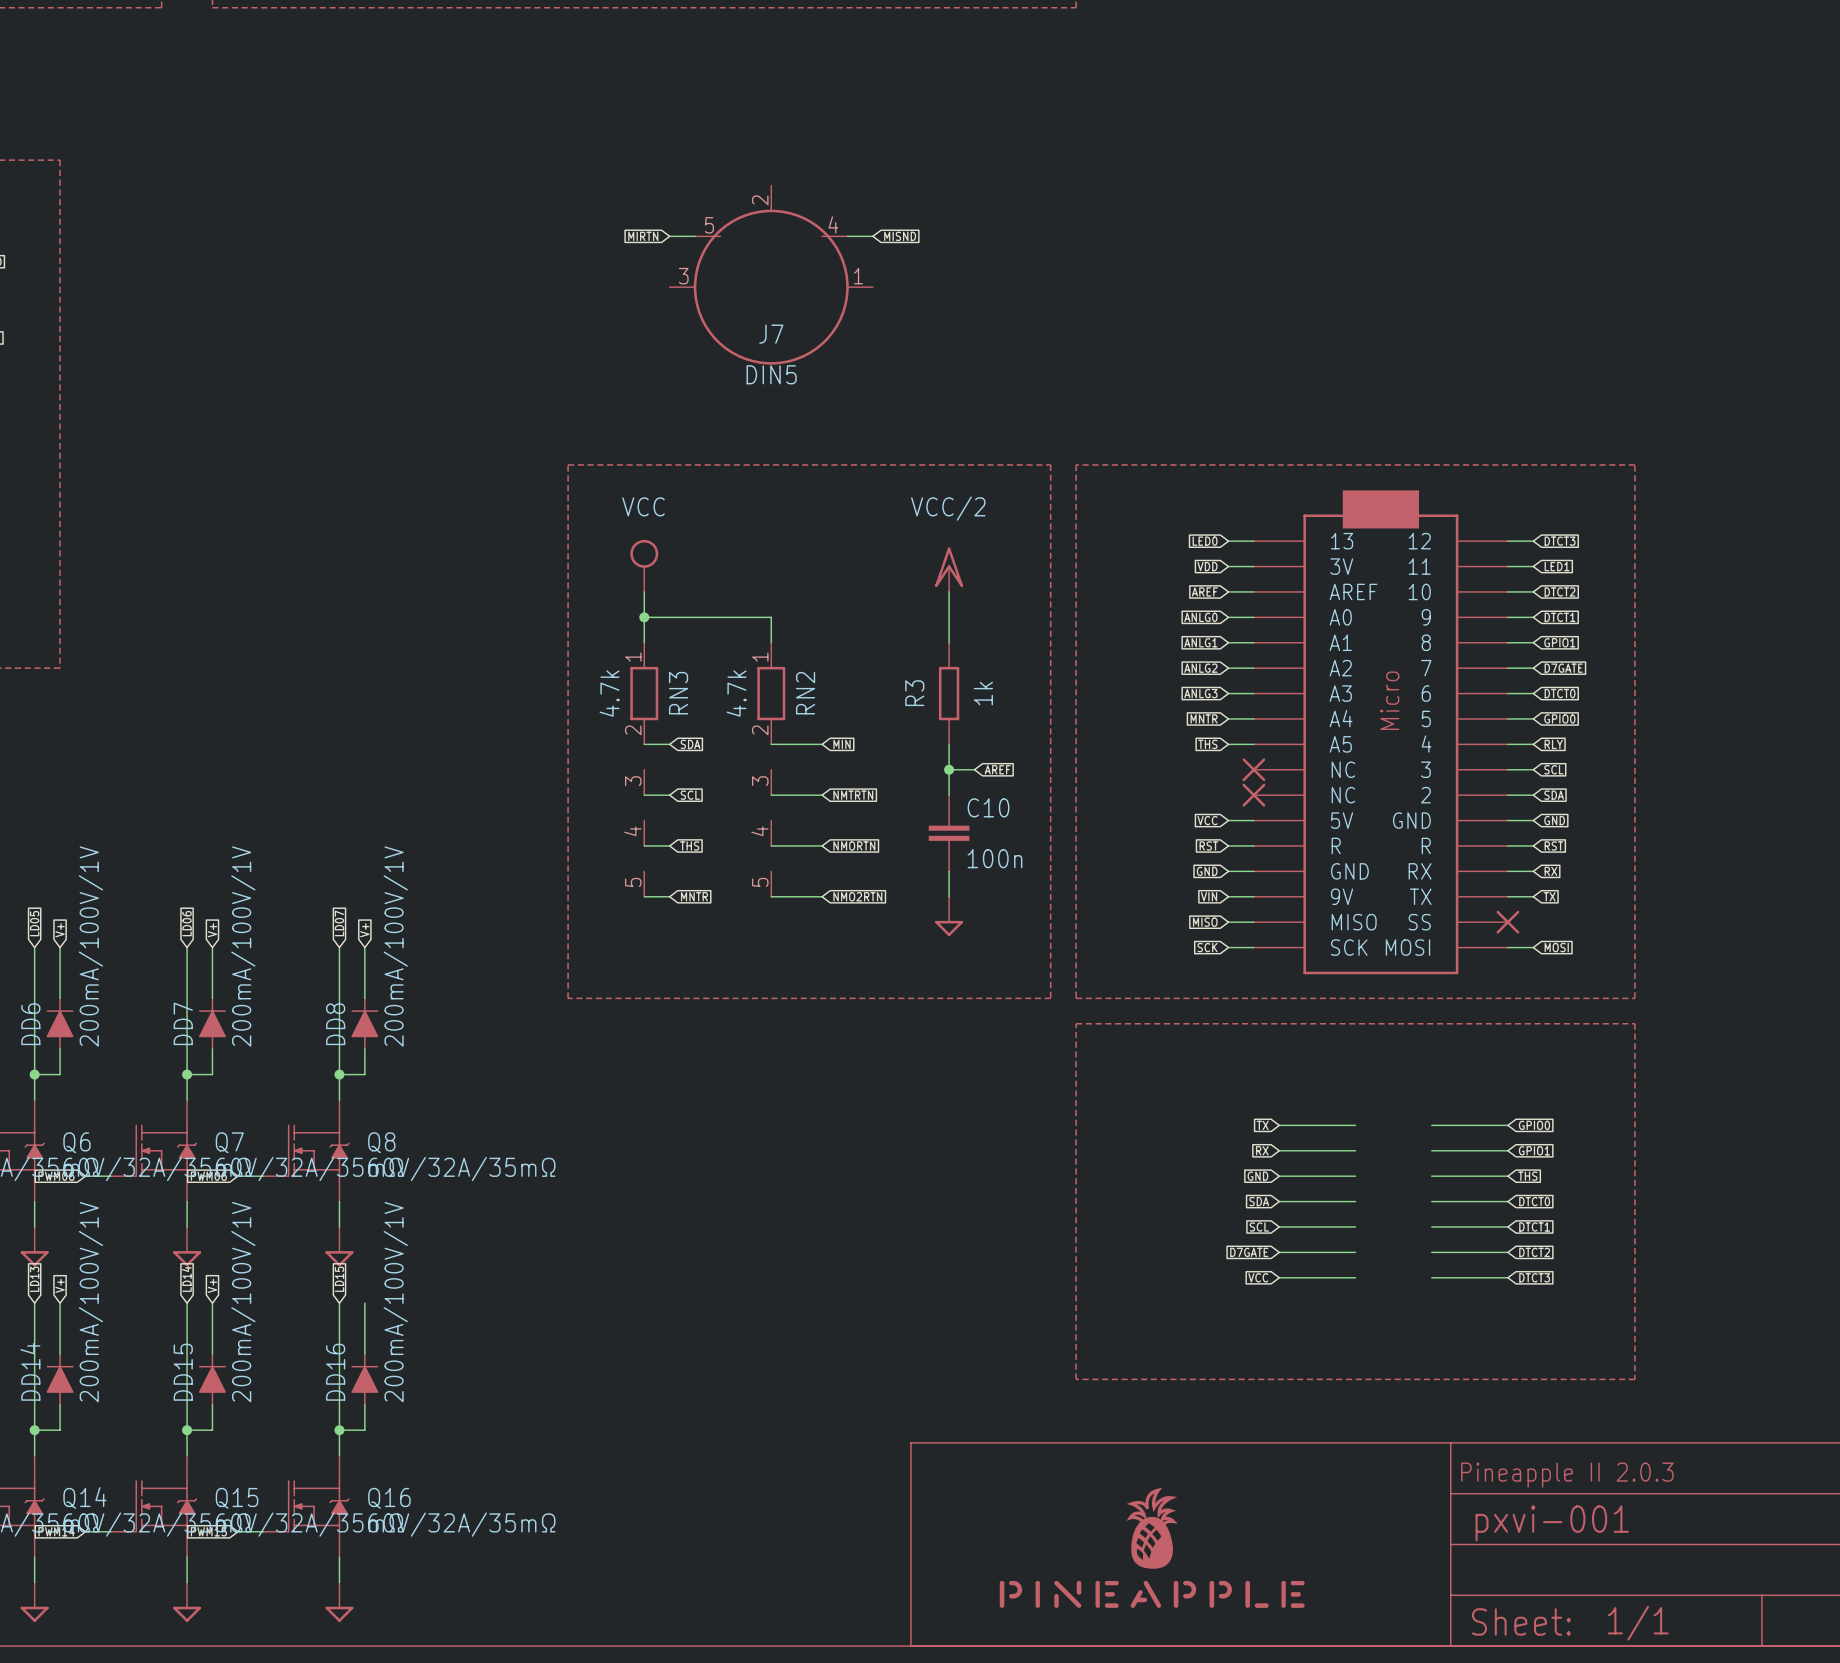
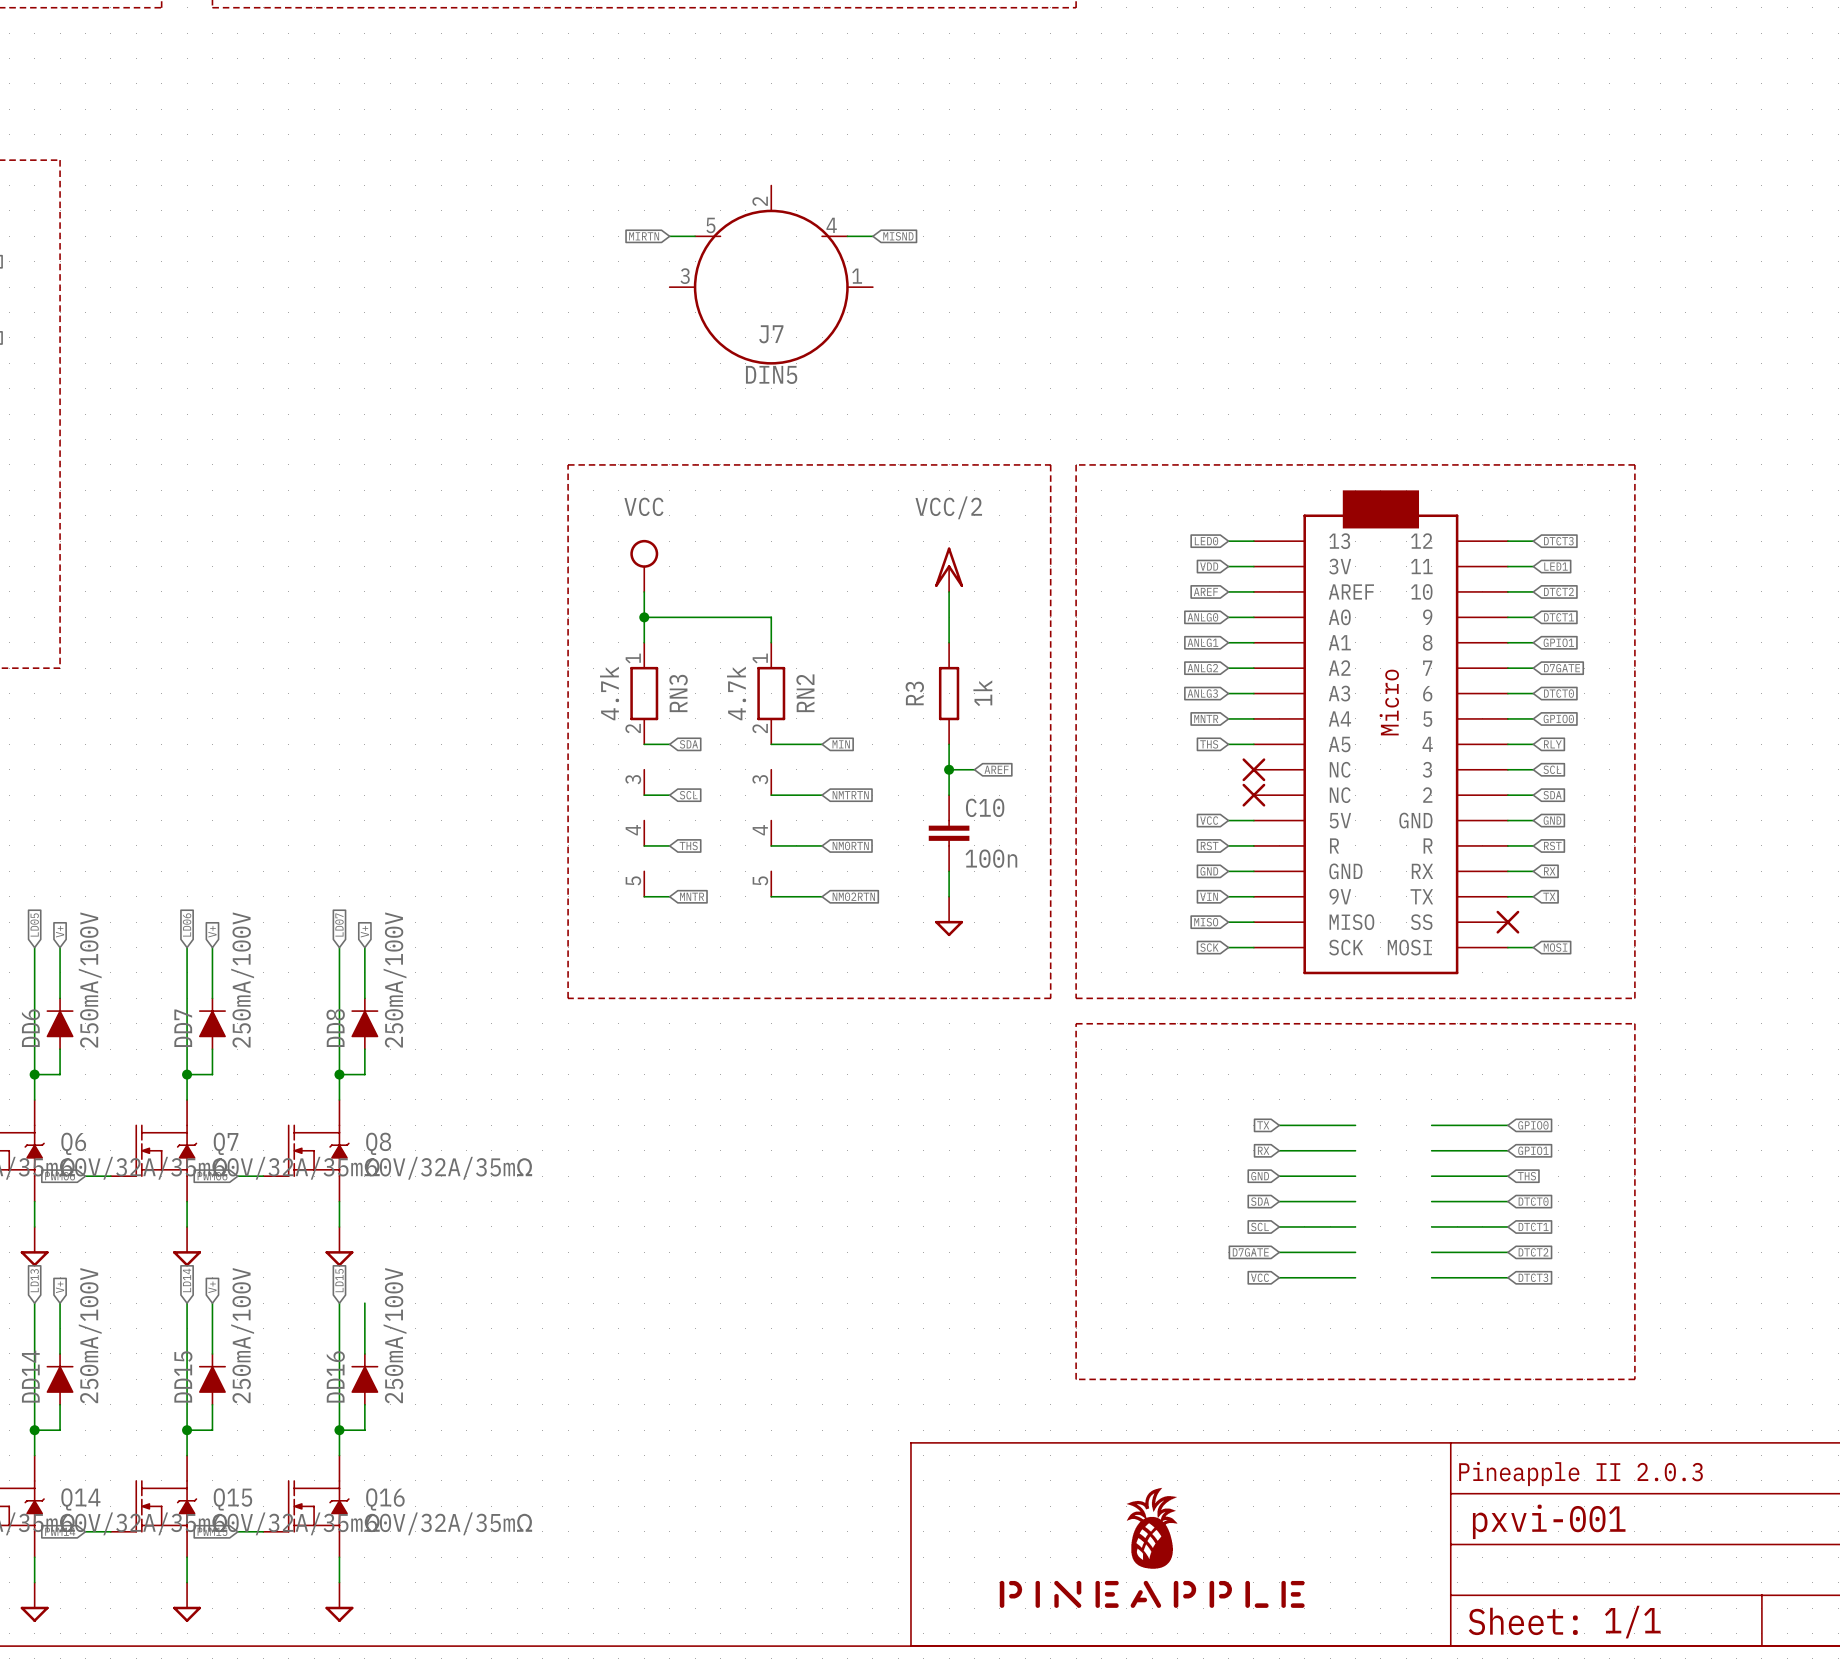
DD6 value: 200mA/100V/1V (90, 946) -> 250mA/100V (90, 980)
DD7 value: 200mA/100V/1V (243, 946) -> 250mA/100V (242, 980)
DD8 value: 200mA/100V/1V (395, 946) -> 250mA/100V (395, 980)
DD14 value: 200mA/100V/1V (90, 1302) -> 250mA/100V (90, 1335)
DD15 value: 200mA/100V/1V (243, 1302) -> 250mA/100V (242, 1335)
DD16 value: 200mA/100V/1V (395, 1302) -> 250mA/100V (395, 1335)

